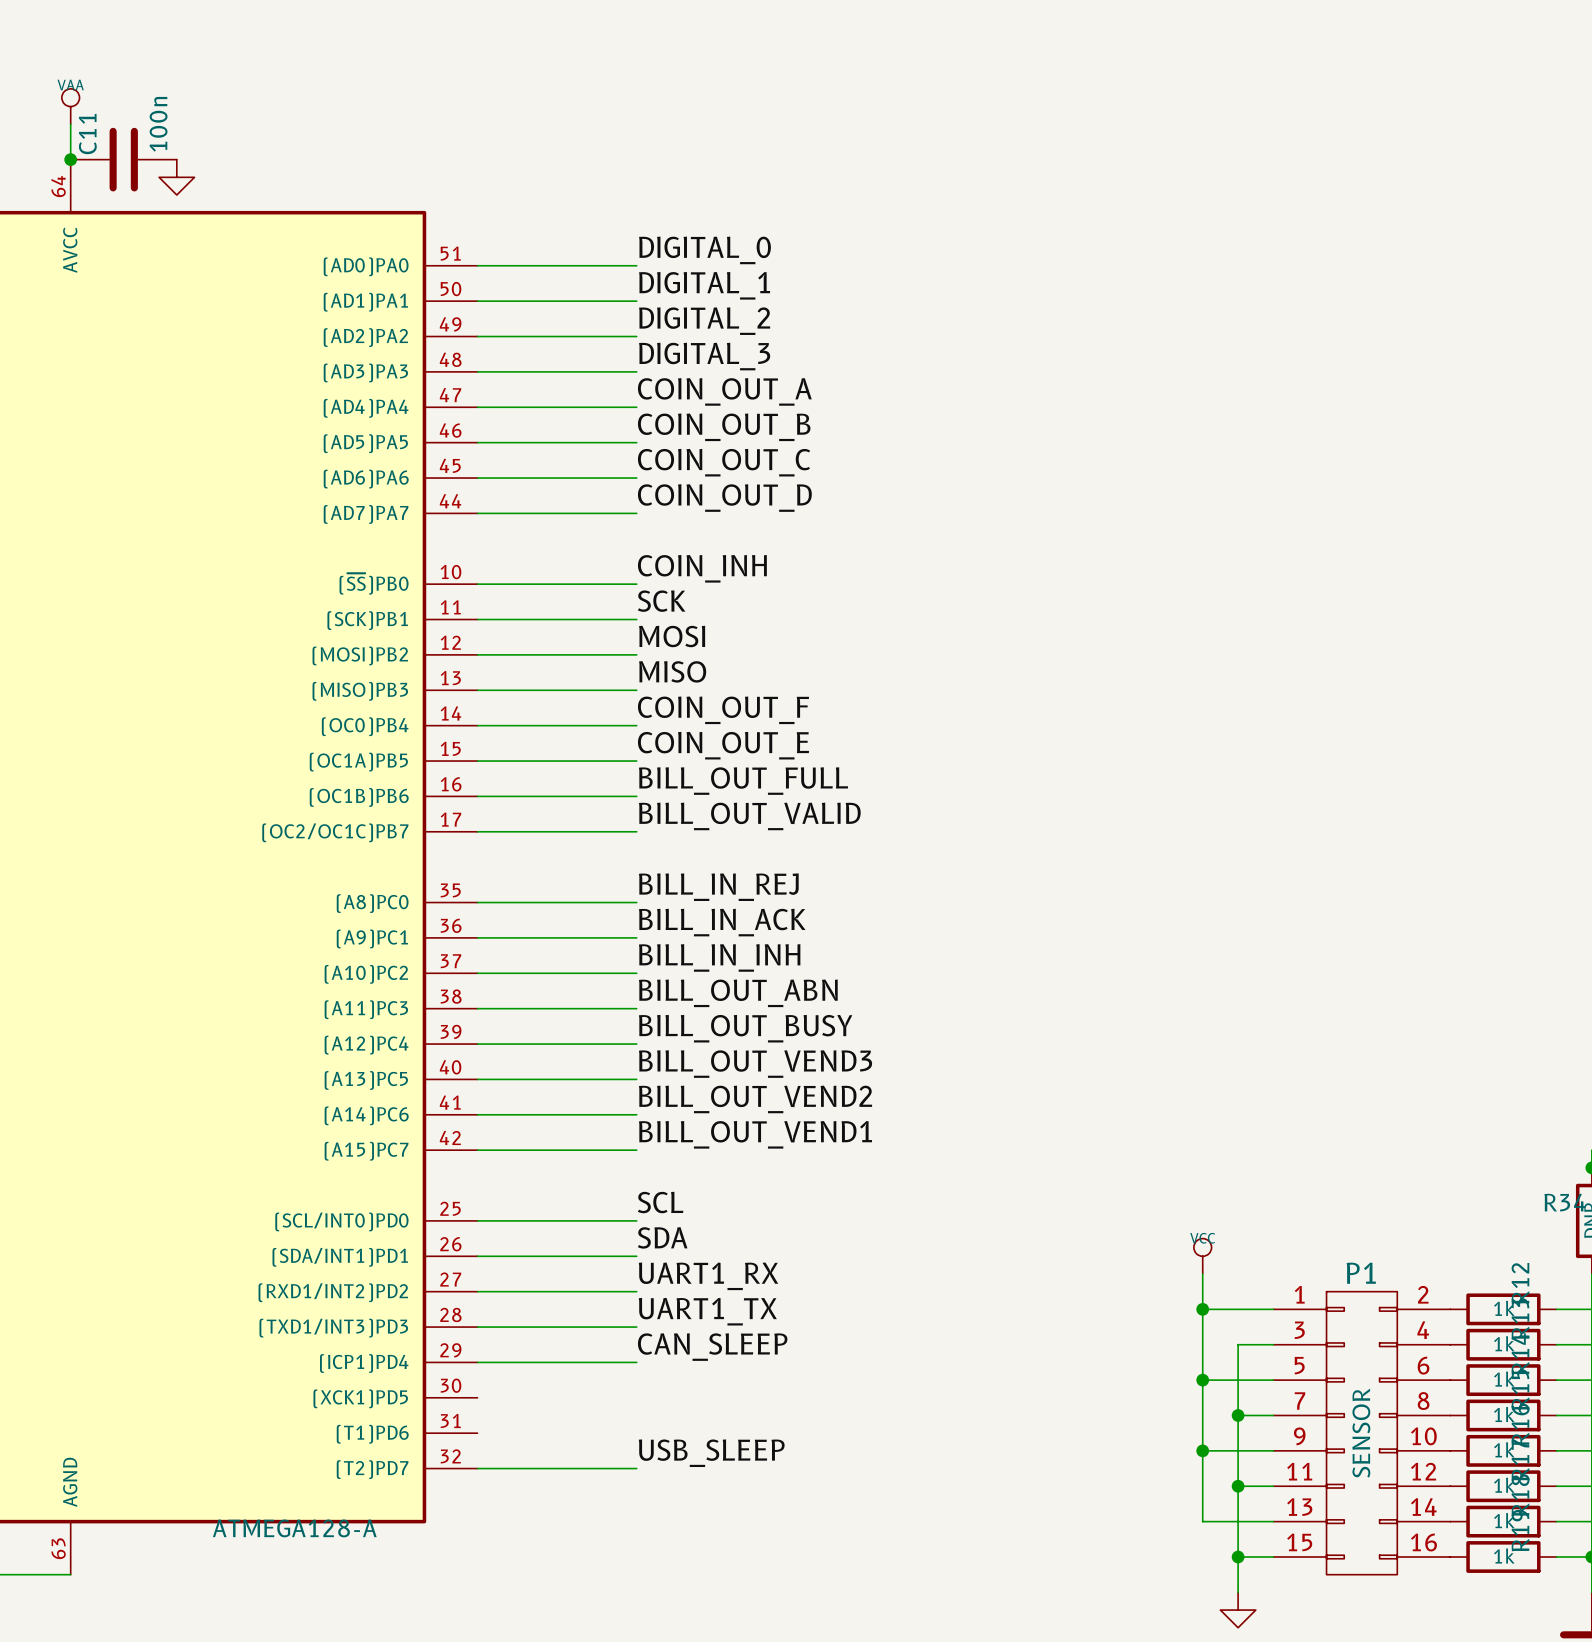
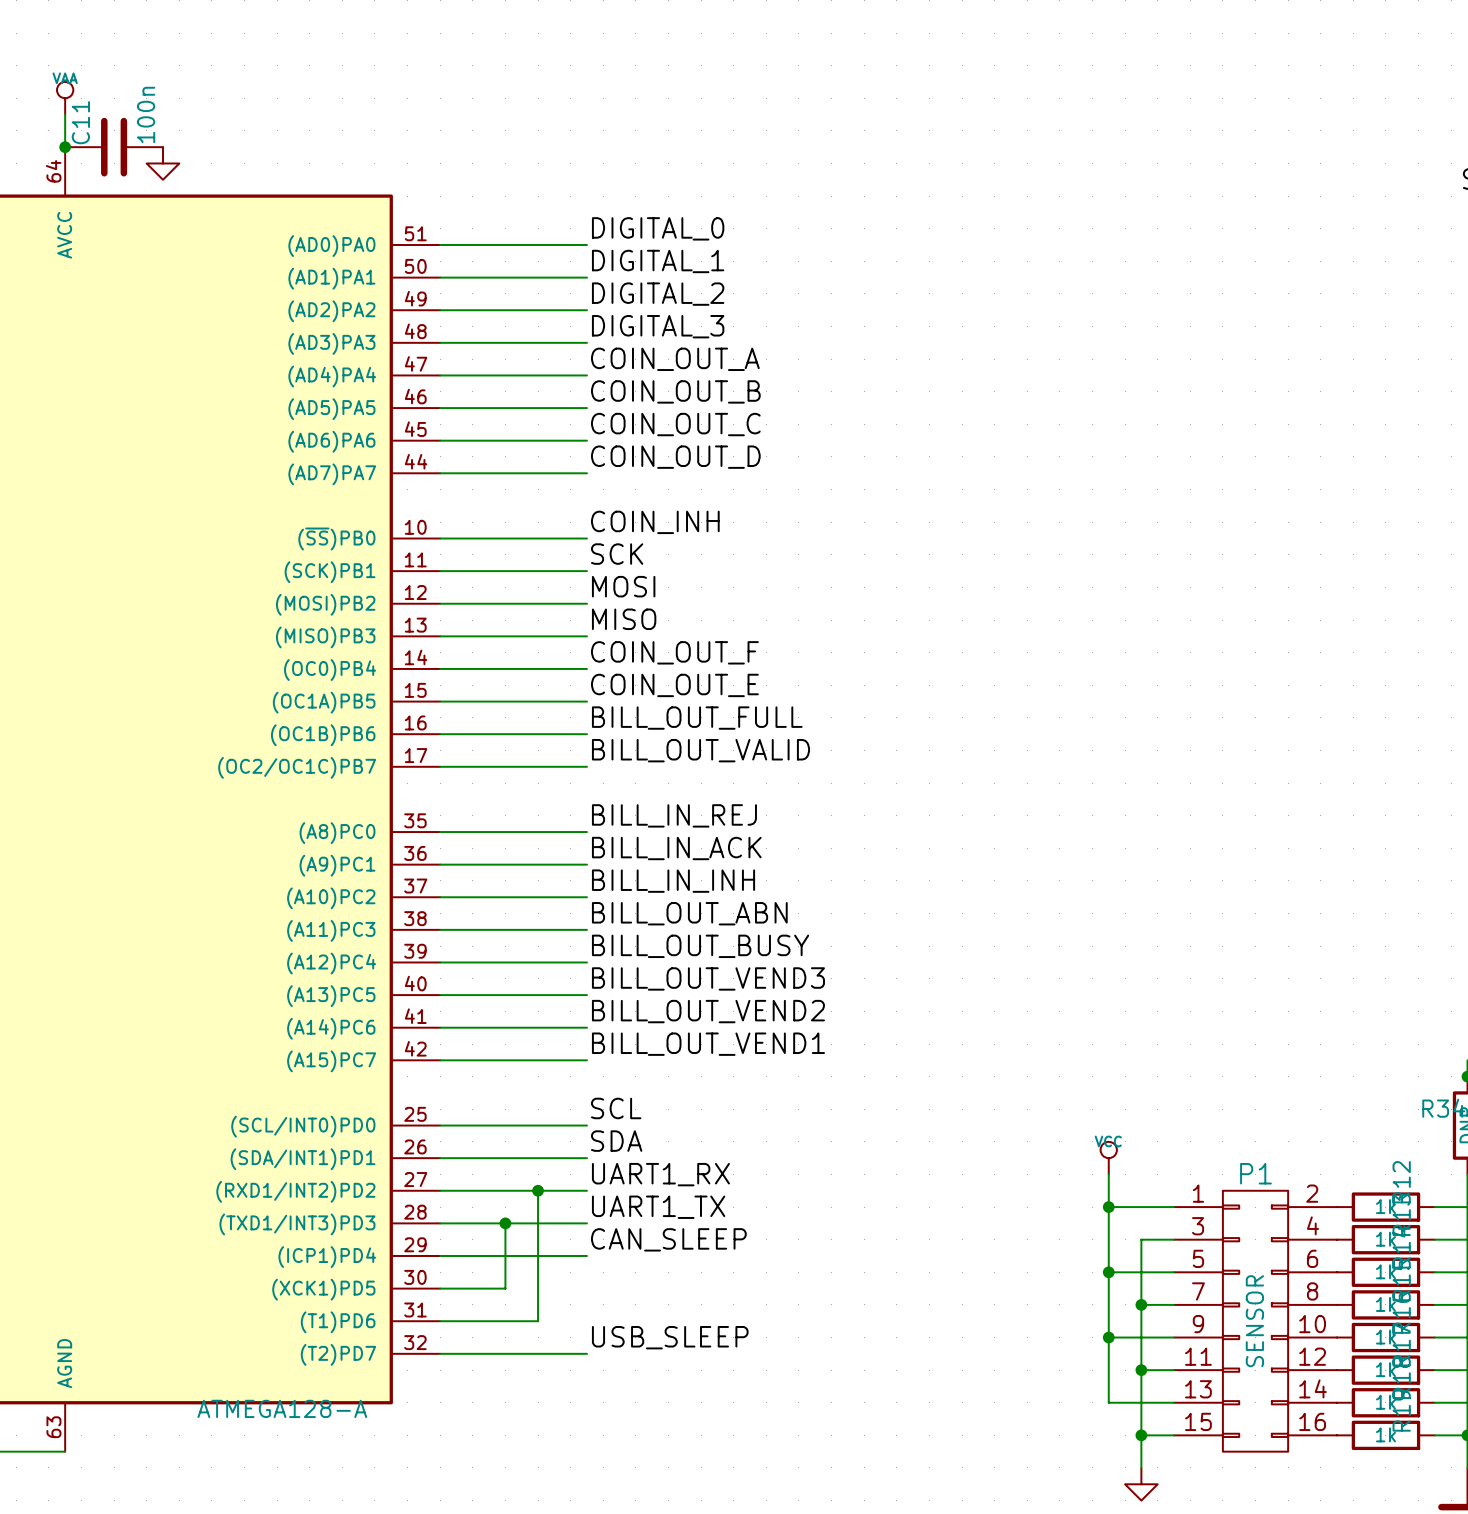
wire: none -> (538, 1190) (538, 1321) (440, 1321)
junction: none -> (538, 1190)
wire: none -> (505, 1223) (505, 1288) (440, 1288)
junction: none -> (505, 1223)

